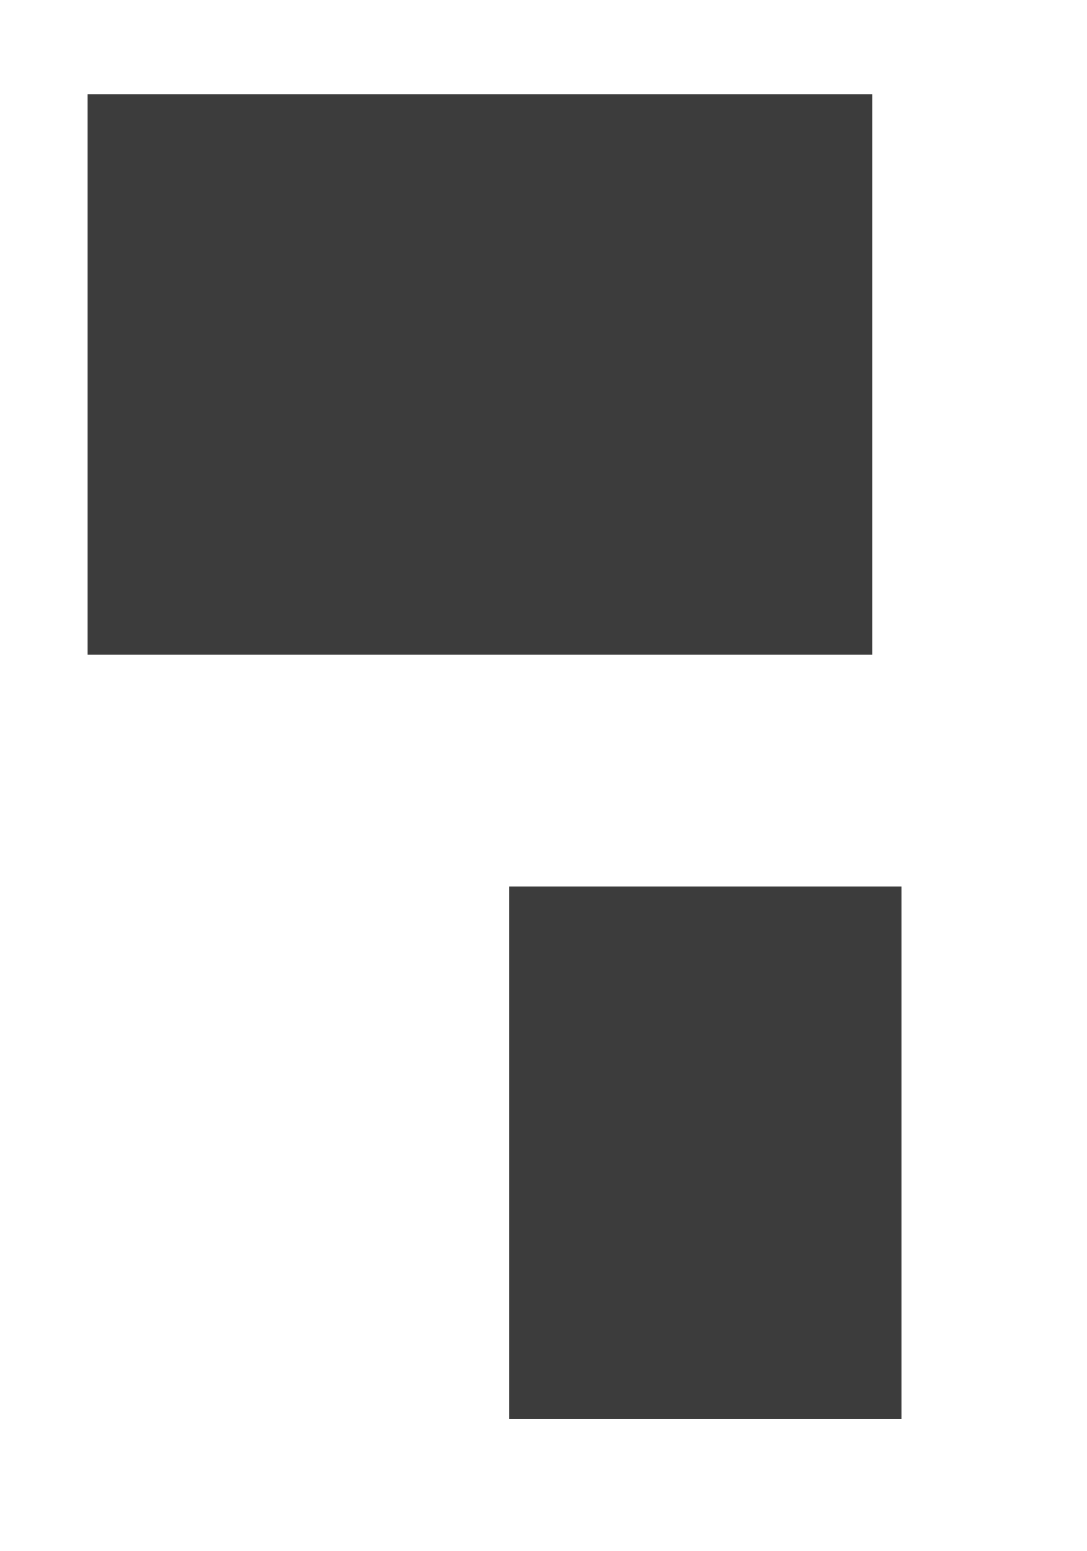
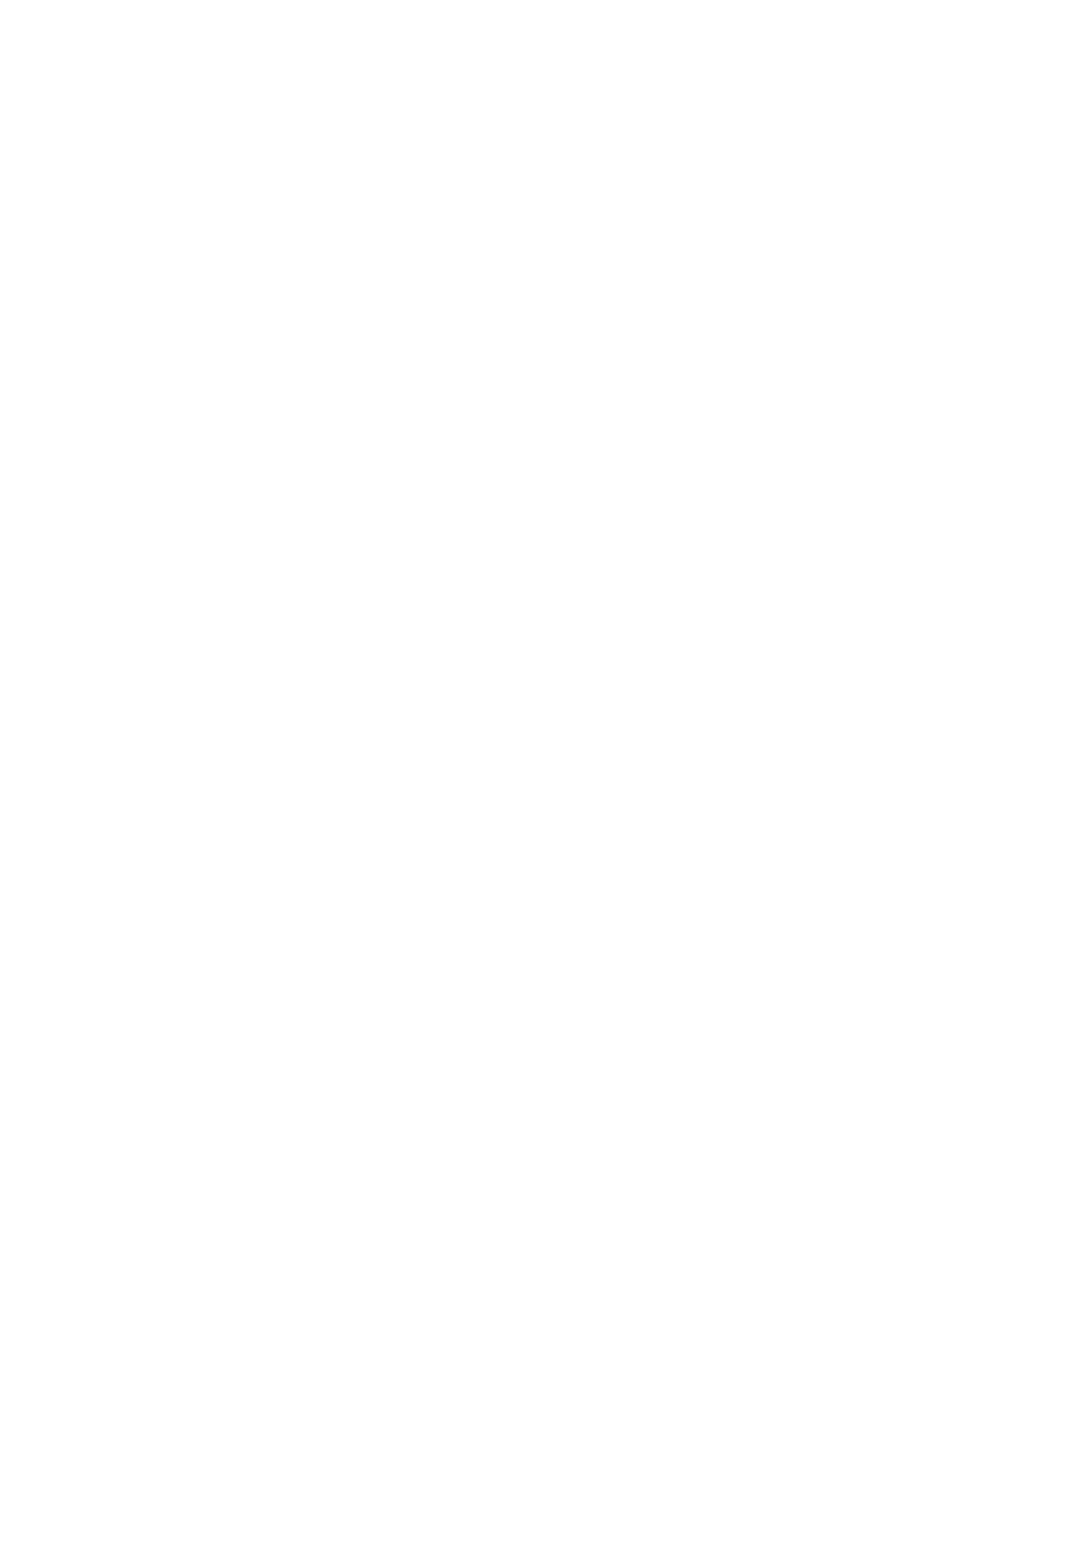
drawing: [87, 94, 873, 655] -> none
drawing: [509, 886, 902, 1419] -> none

